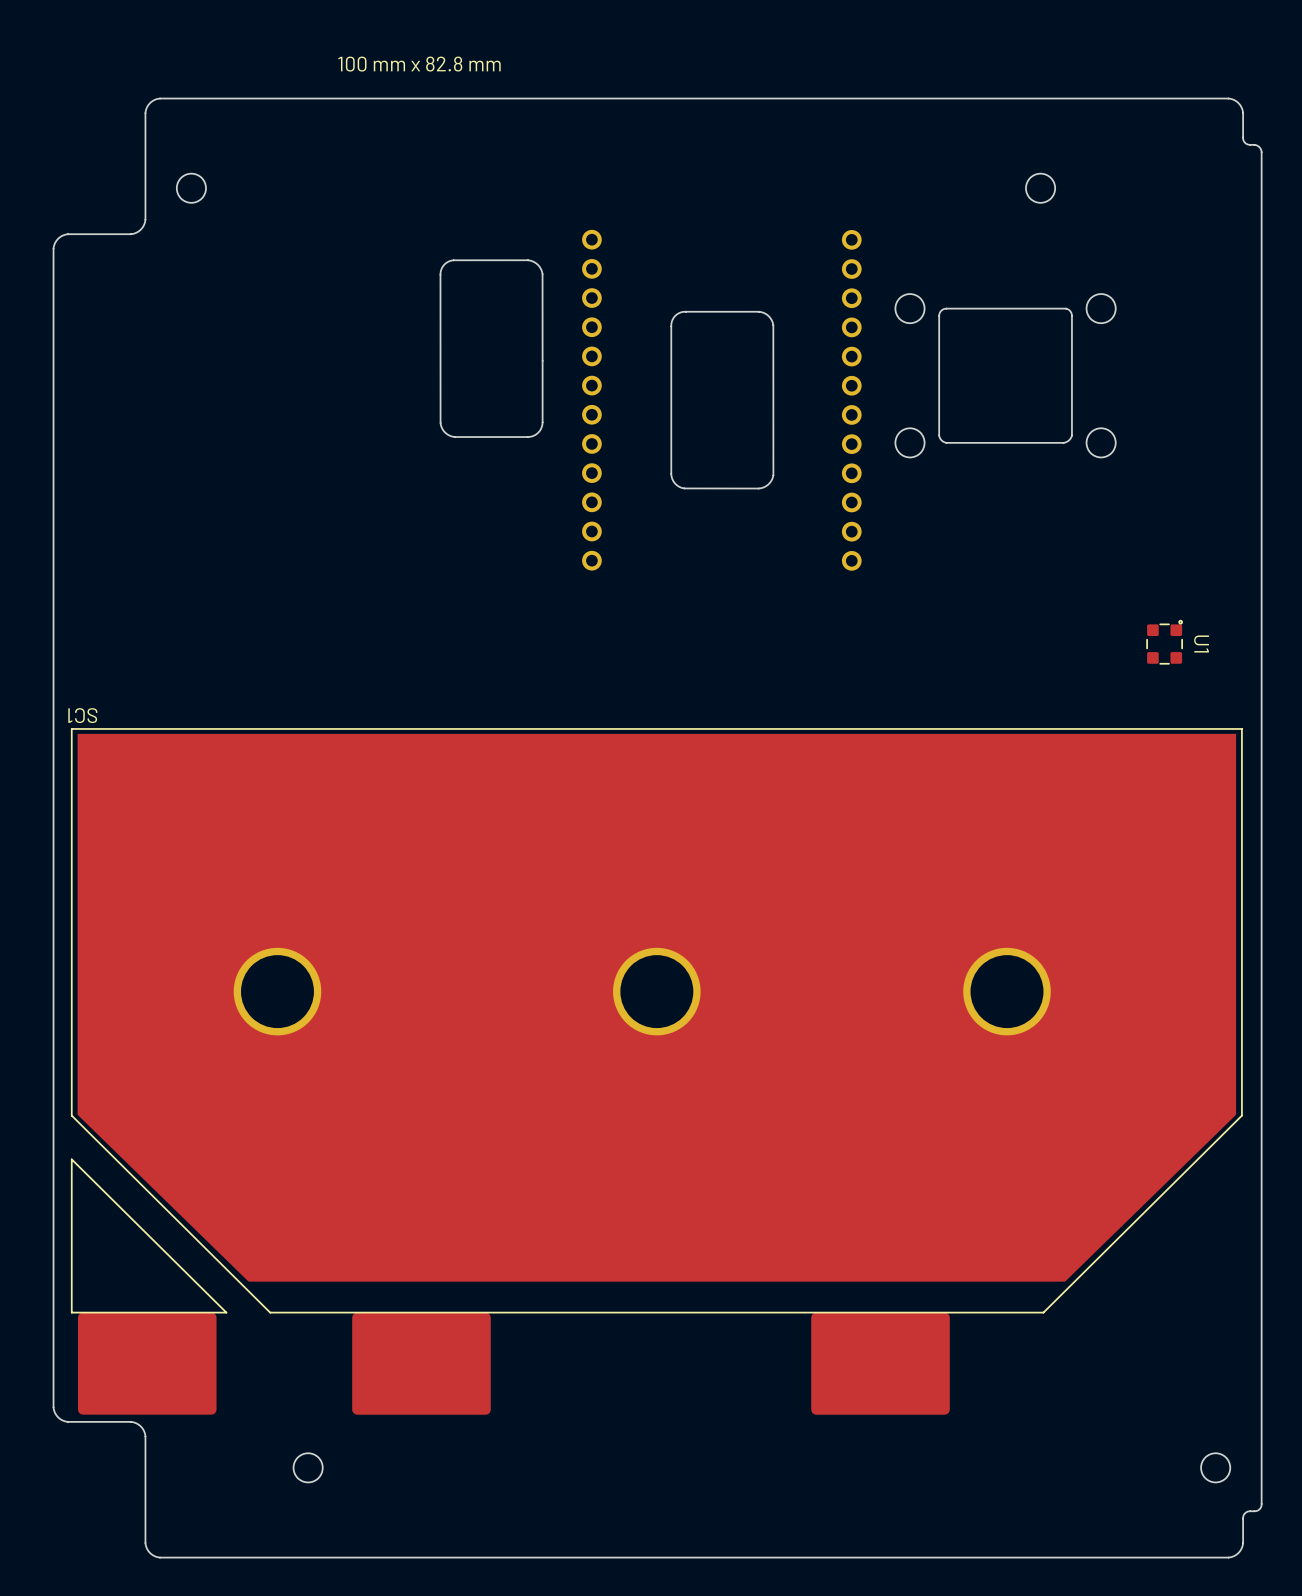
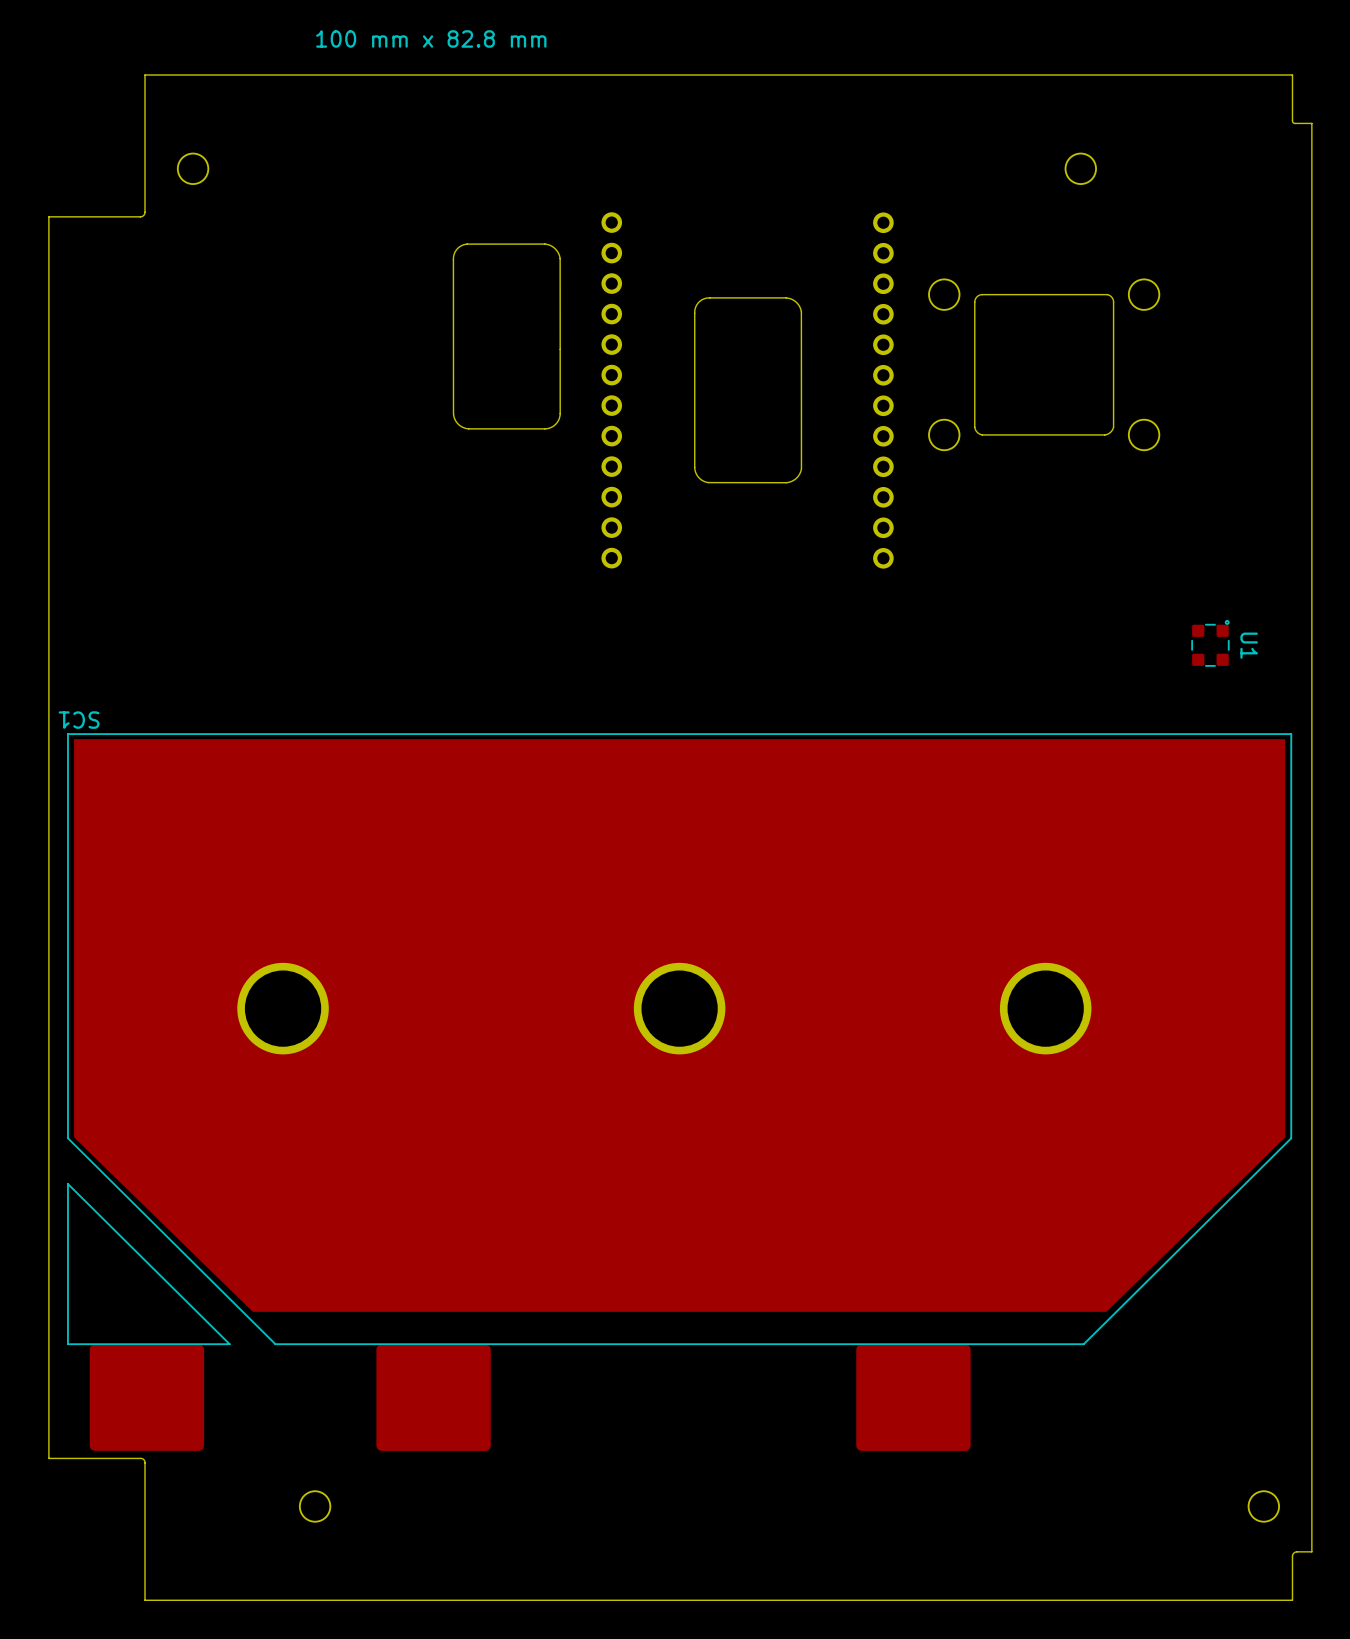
drawing shape: [53, 98, 1262, 1558] -> [48, 74, 1313, 1601]
SC1 footprint: [70, 728, 1243, 1415] -> [67, 733, 1293, 1451]

